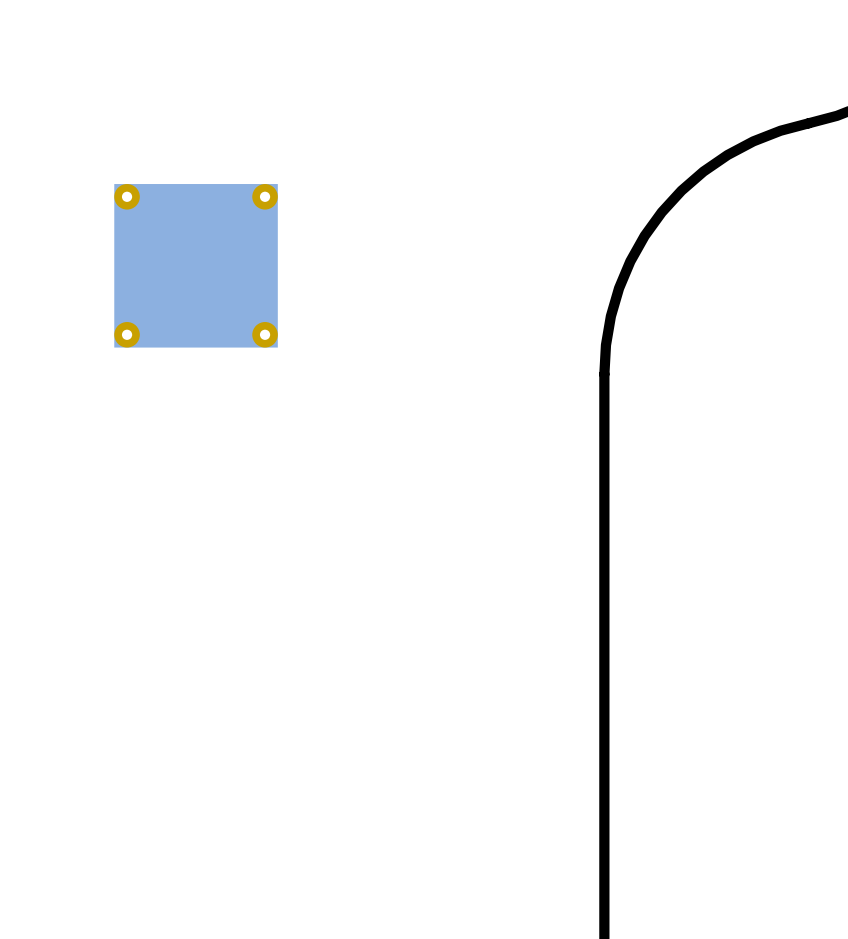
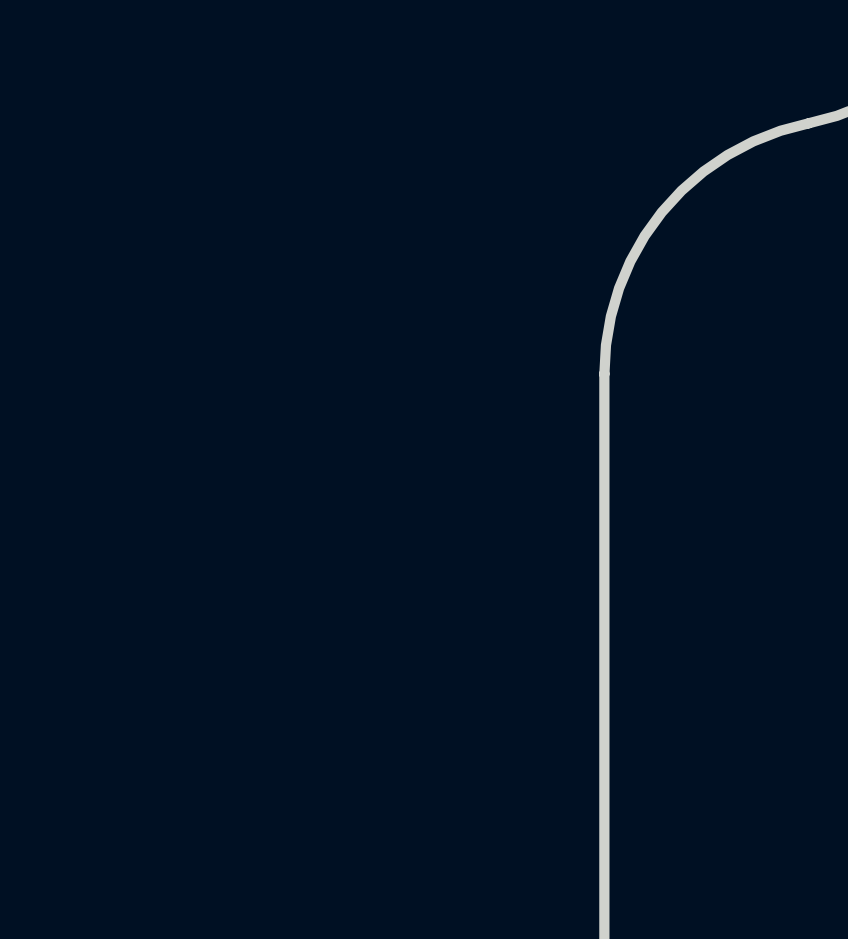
part: (196, 265) -> none

